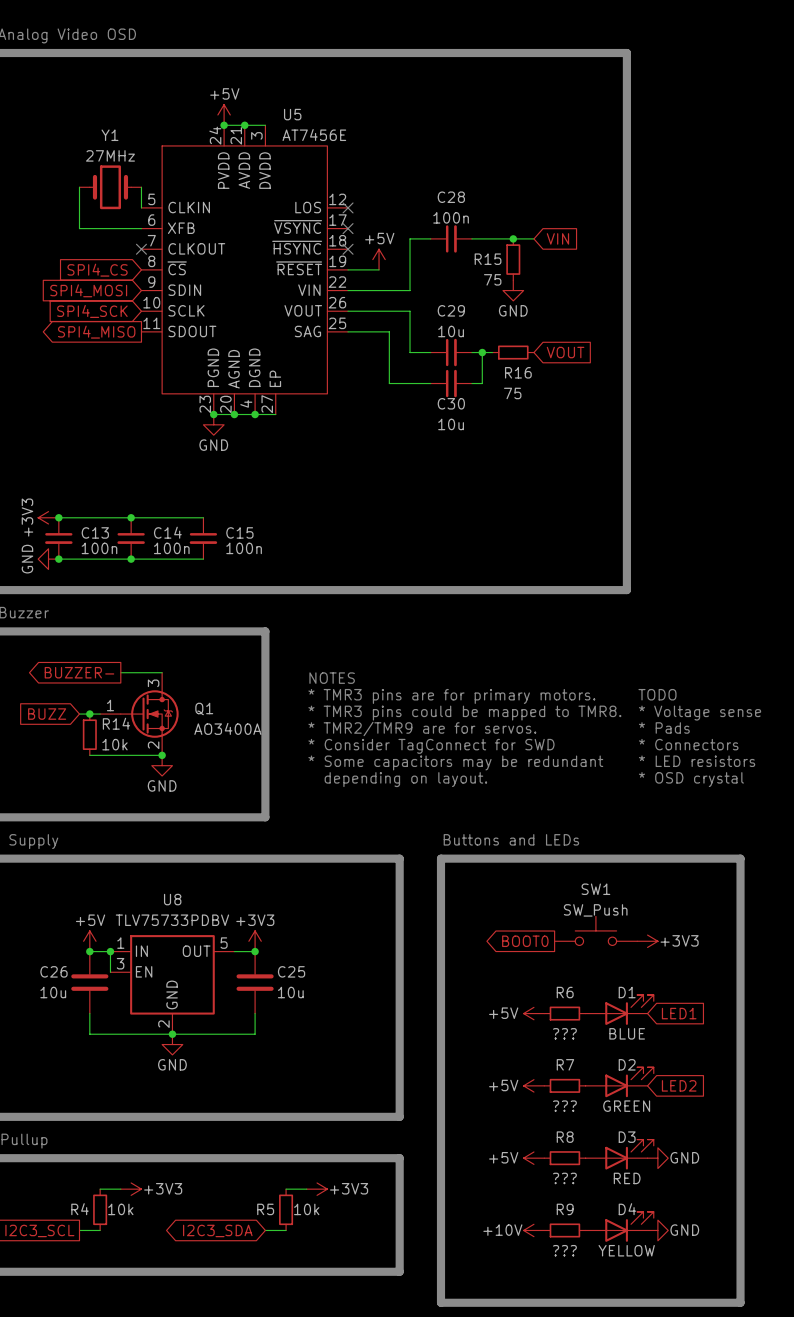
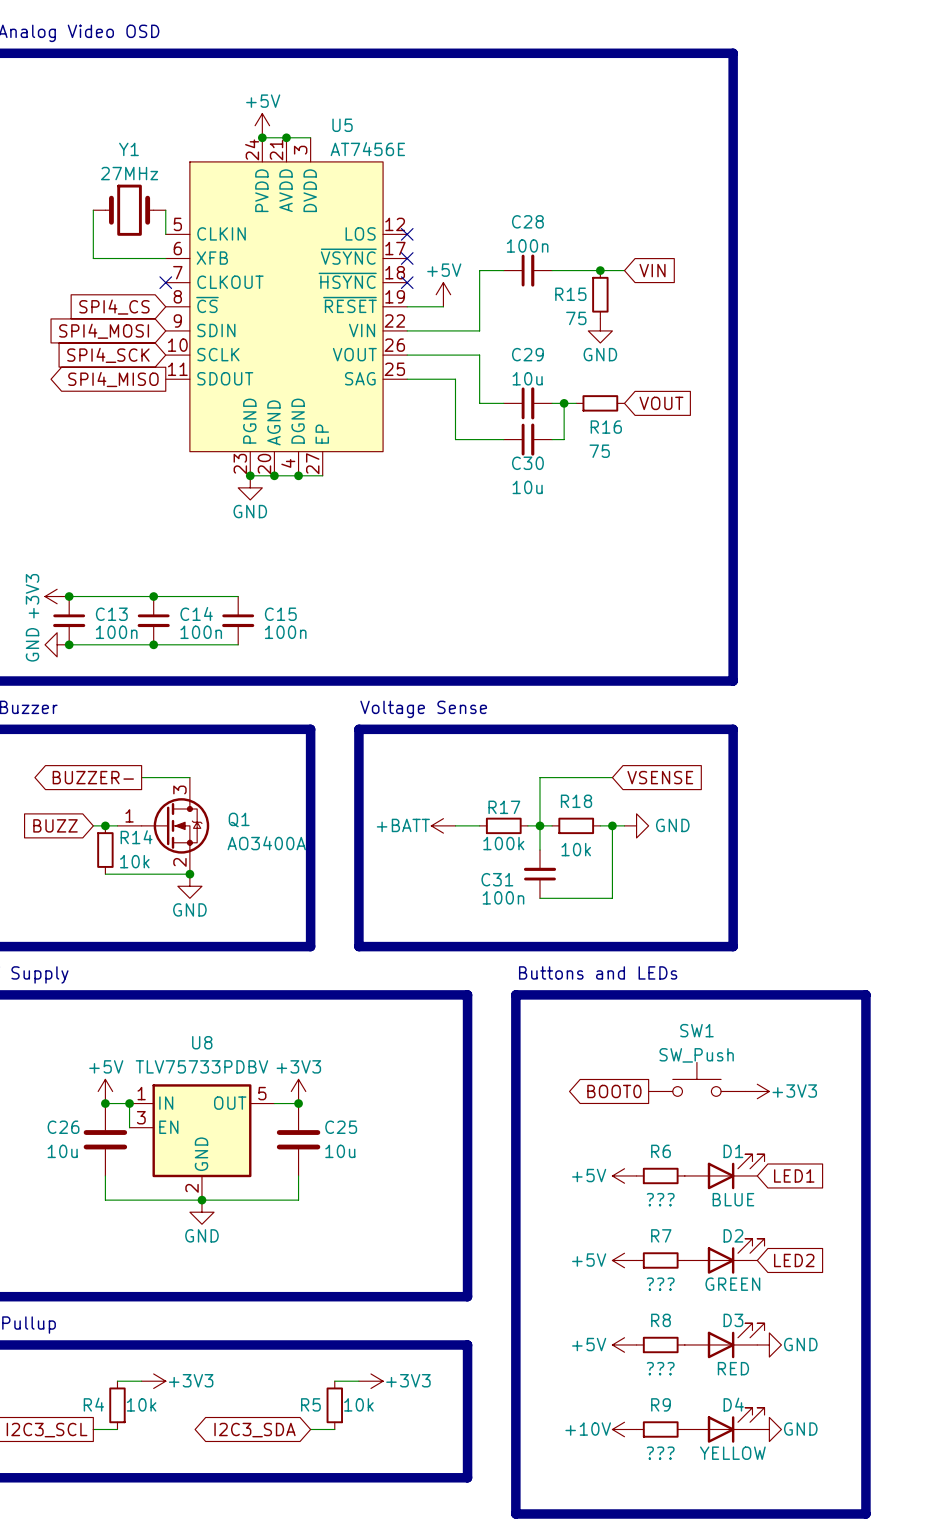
text: none -> Voltage Sense (423, 709)
line: none -> (358, 729) (733, 729) (733, 946) (358, 946) (358, 729)
wire: none -> (612, 777) (539, 777) (539, 850)
global label: none -> VSENSE (660, 777)
text: NOTES (332, 678) -> none
text: TODO (657, 694) -> none
text: * TMR3 pins are for primary motors. (451, 696) -> none
text: * TMR3 pins could be mapped to TMR8. (464, 713) -> none
text: * Voltage sense (700, 713) -> none
power symbol: none -> +BATT (443, 825)
wire: none -> (455, 825) (479, 825)
R17: none -> 100k (503, 825)
wire: none -> (527, 825) (552, 825)
junction: none -> (539, 825)
R18: none -> 10k (576, 825)
wire: none -> (600, 825) (624, 825)
wire: none -> (612, 825) (612, 898) (539, 898)
junction: none -> (612, 825)
power symbol: none -> GND (636, 825)
text: * Pads (664, 727) -> none
text: * TMR2/TMR9 are for servos. (422, 728) -> none
text: * Connectors (688, 744) -> none
text: * Consider TagConnect for SWD (431, 746) -> none
C31: none -> 100n (539, 874)
text: * LED resistors (697, 761) -> none
text: * Some capacitors may be redundant (455, 762) -> none
text: depending on layout. (405, 779) -> none
text: * OSD crystal (691, 779) -> none

